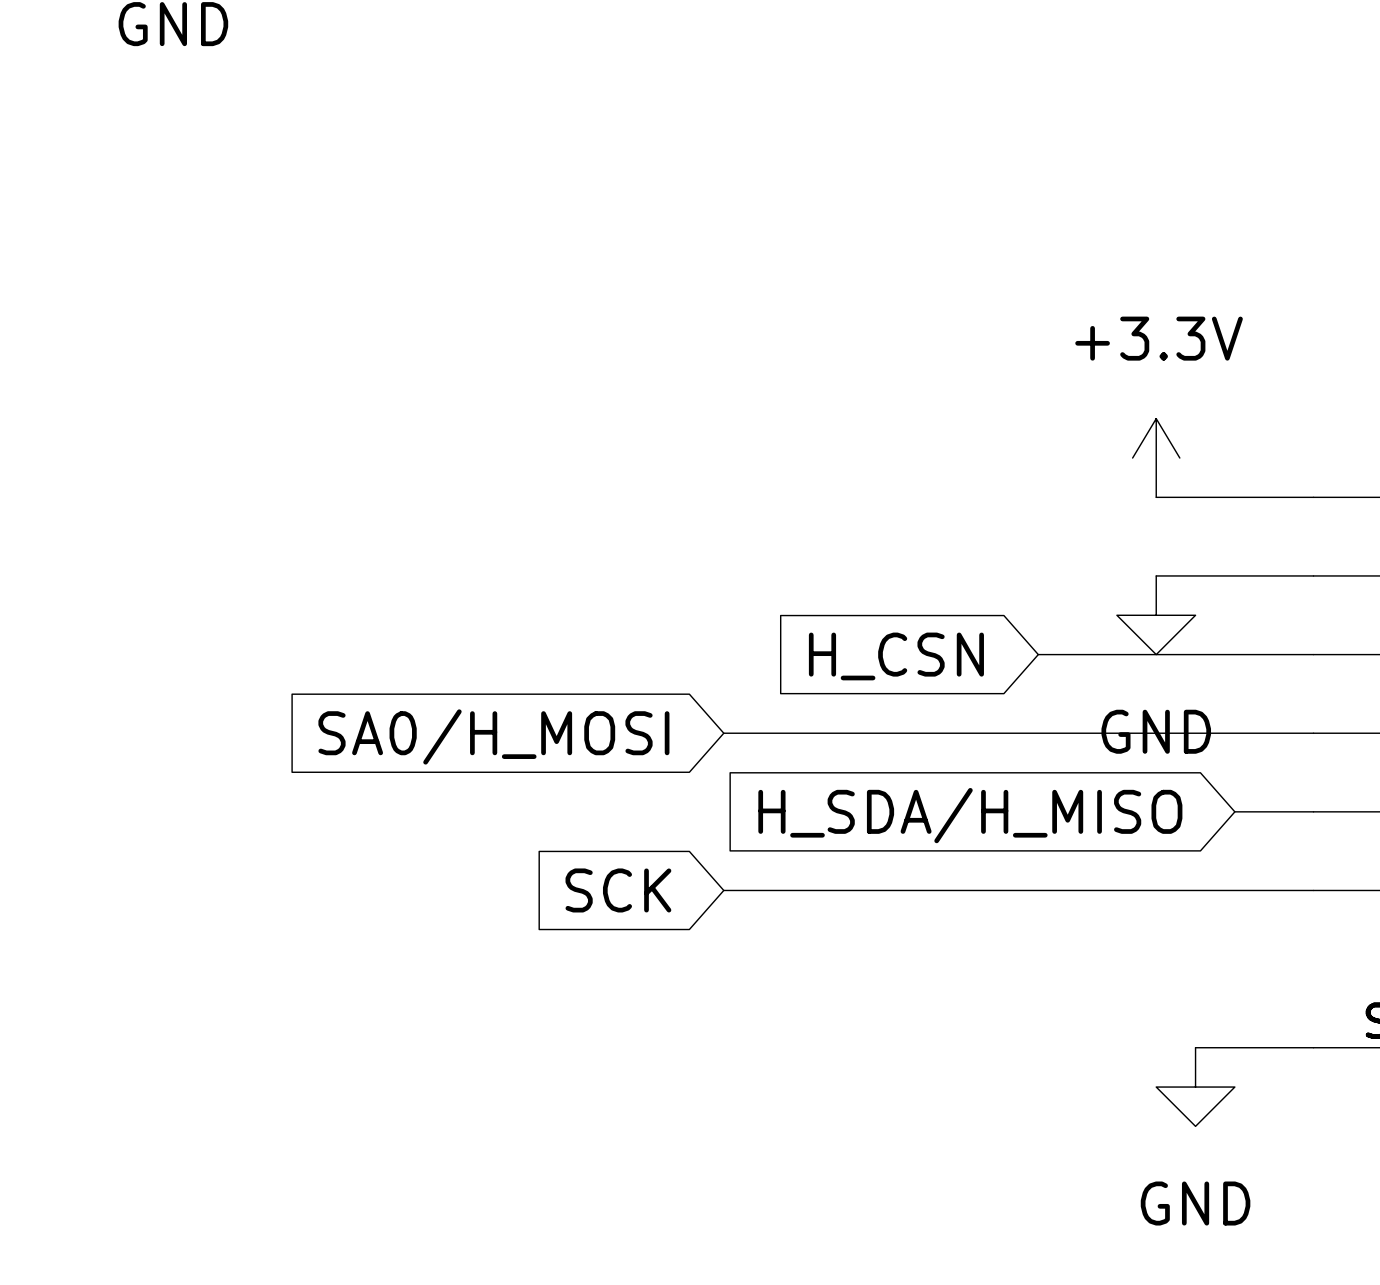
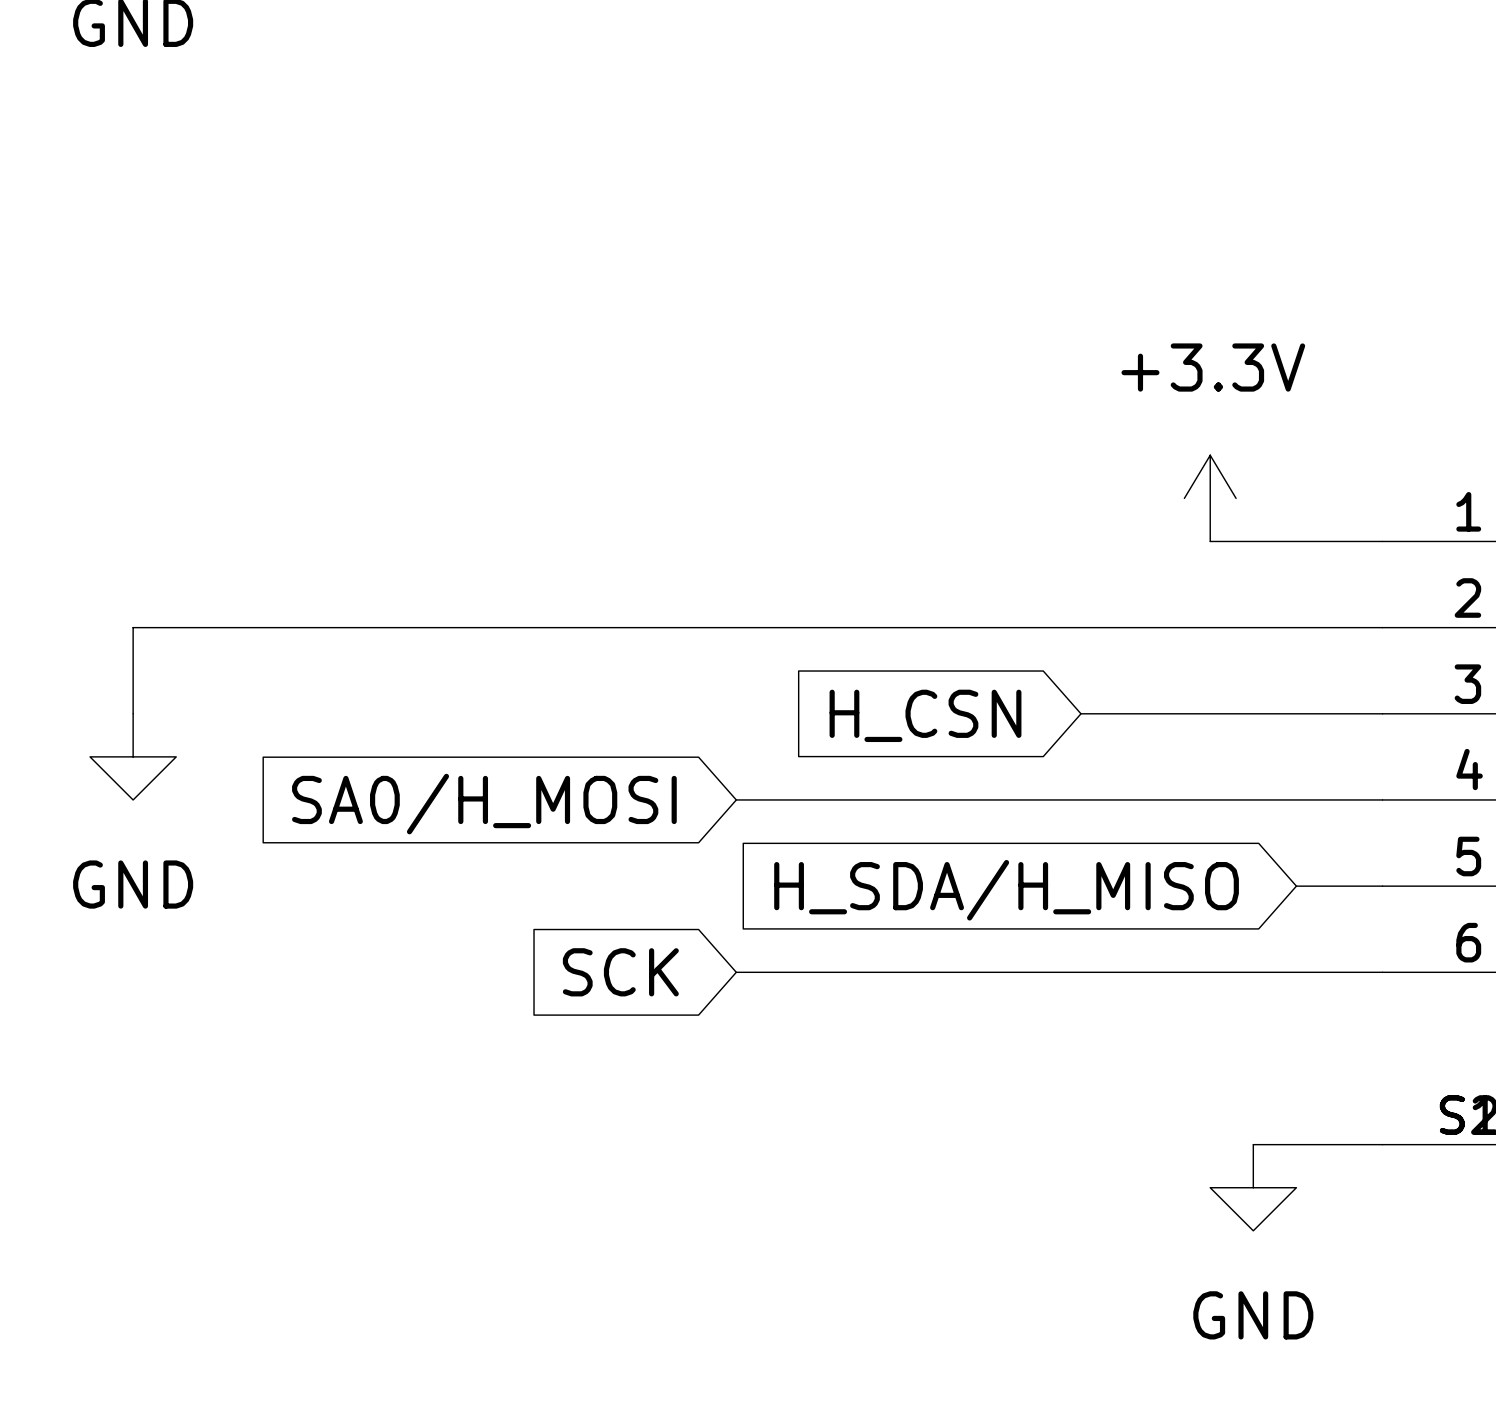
wire: none -> (1210, 627) (133, 627) (133, 713)
power symbol: GND (1156, 615) -> none
power symbol: none -> GND (133, 756)

